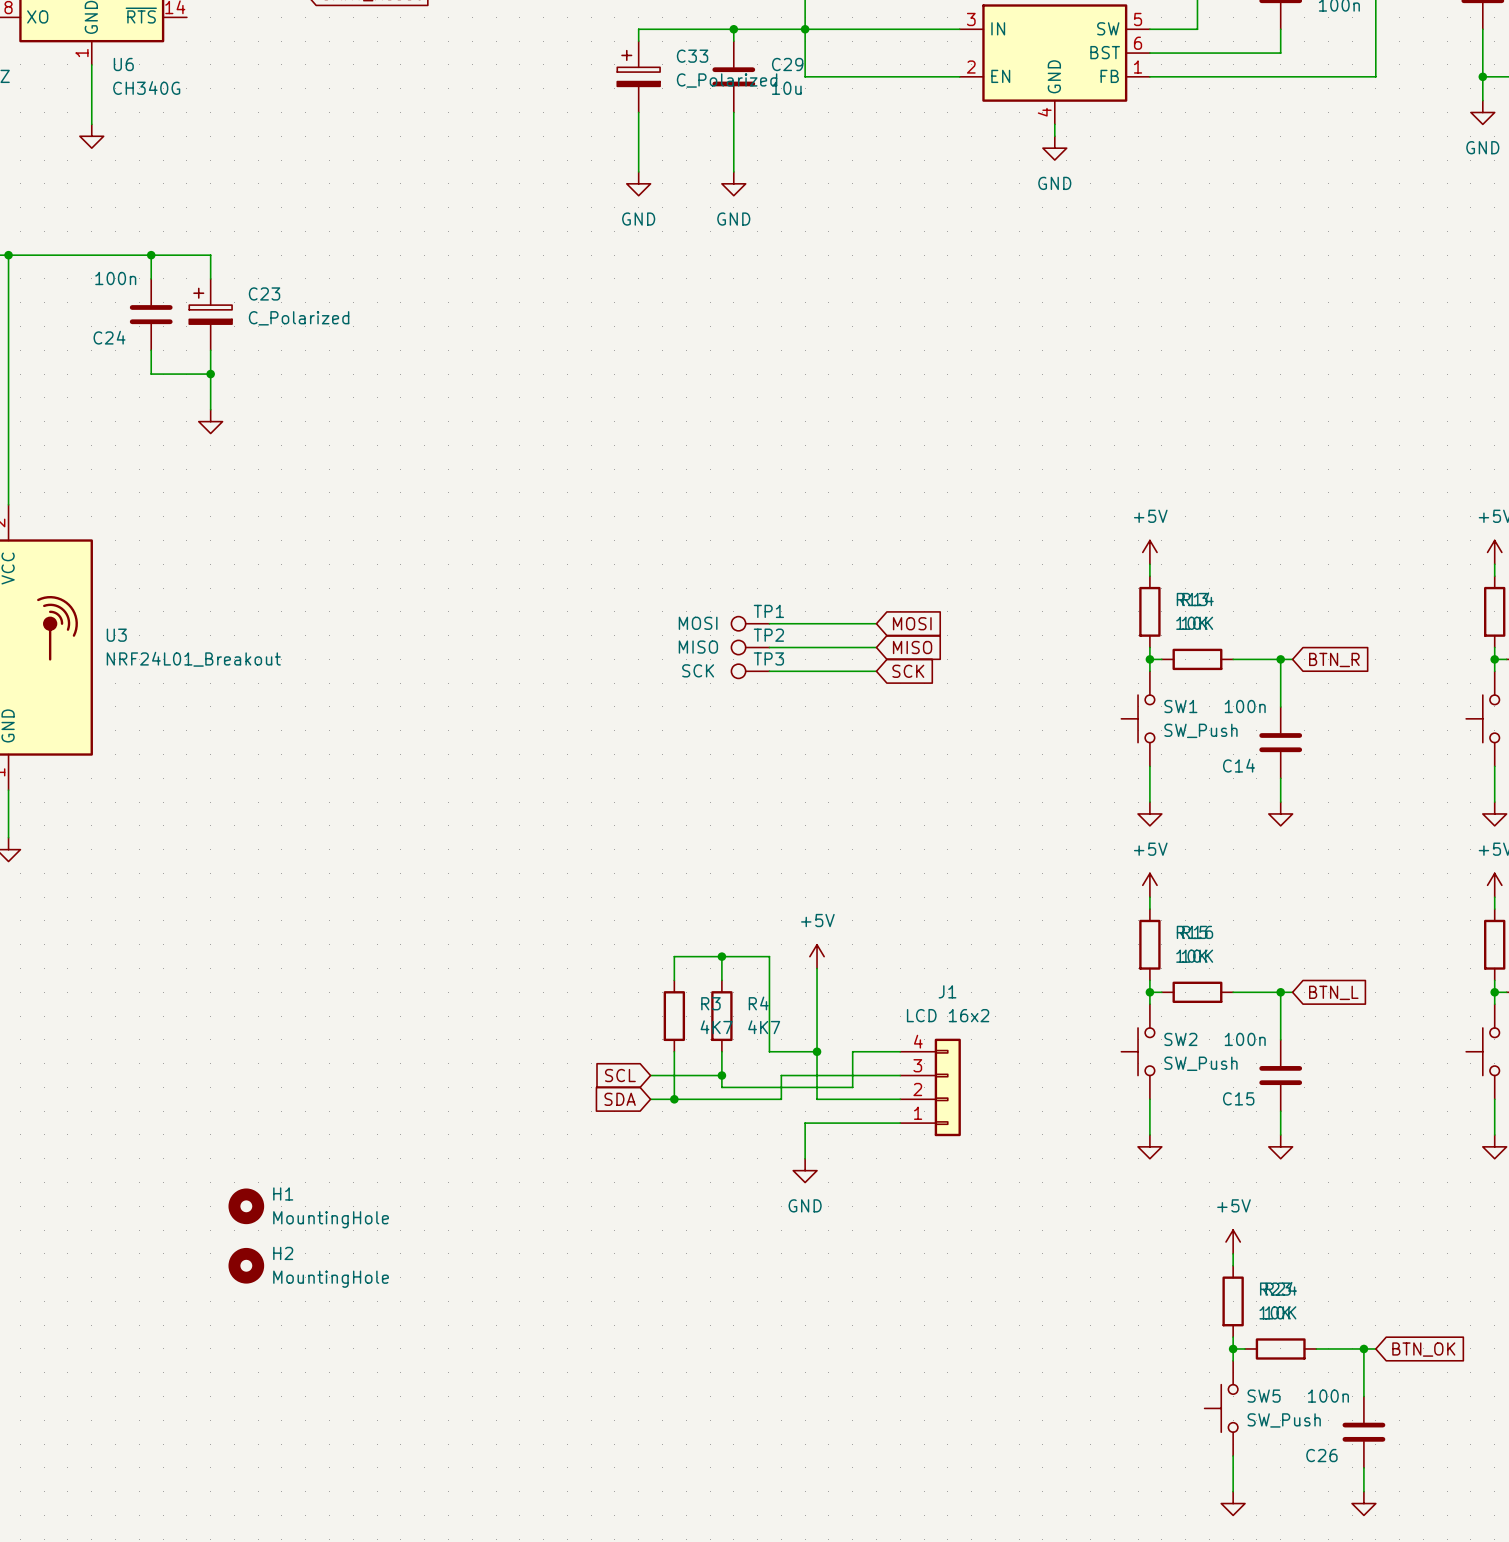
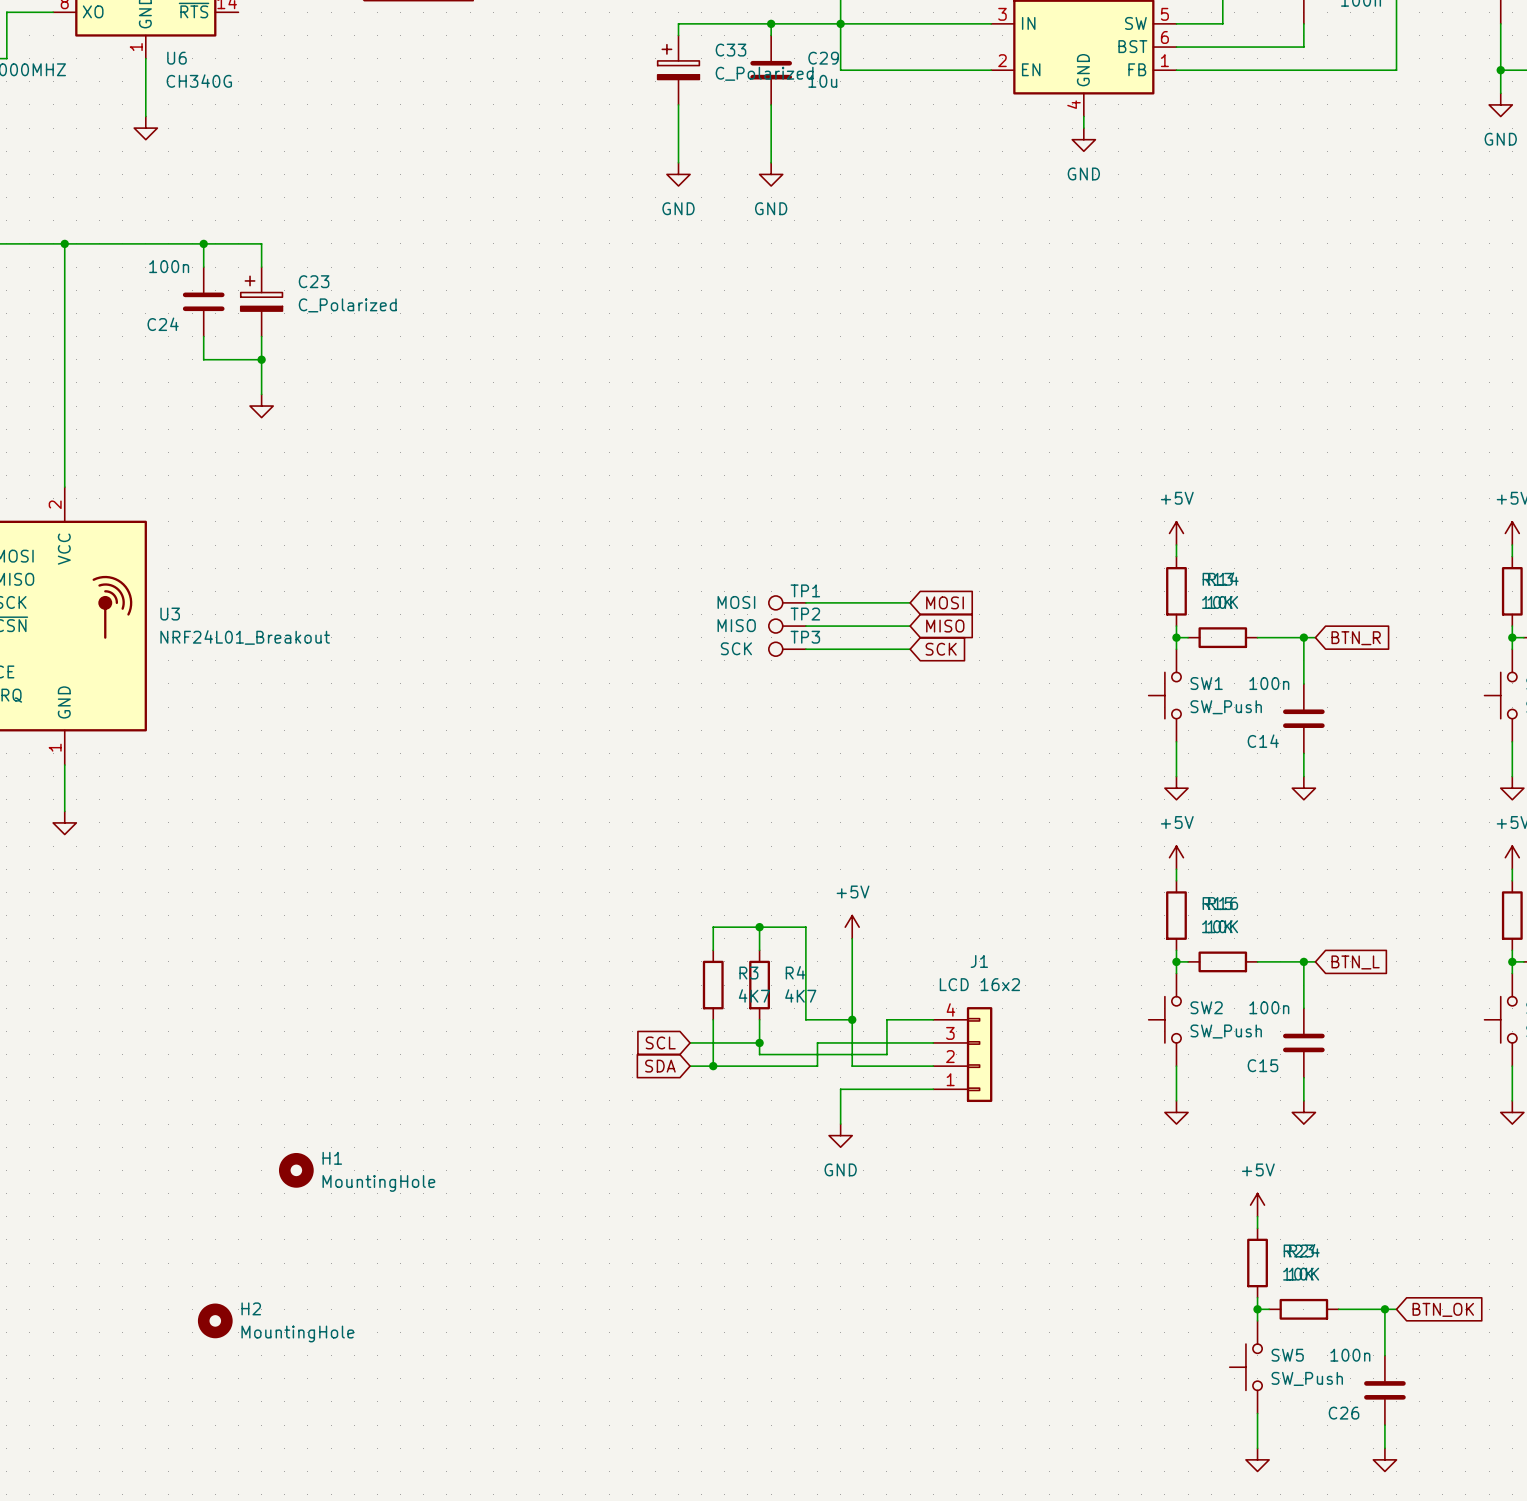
H2 position: (246, 1265) -> (215, 1320)

